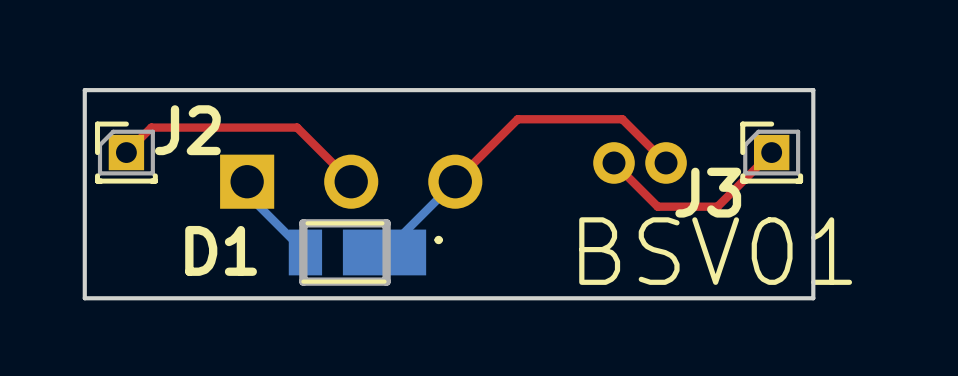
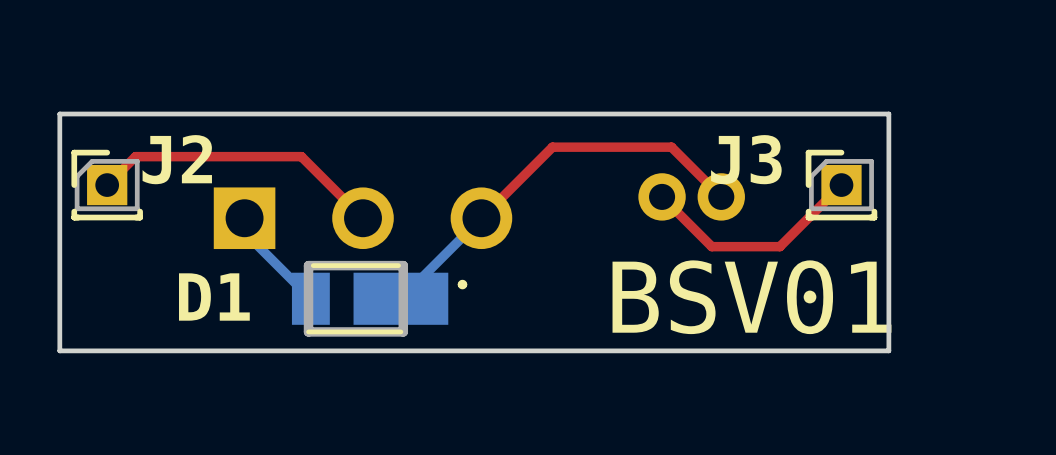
J3 name position: J3 (708, 192) -> J3 (746, 159)

